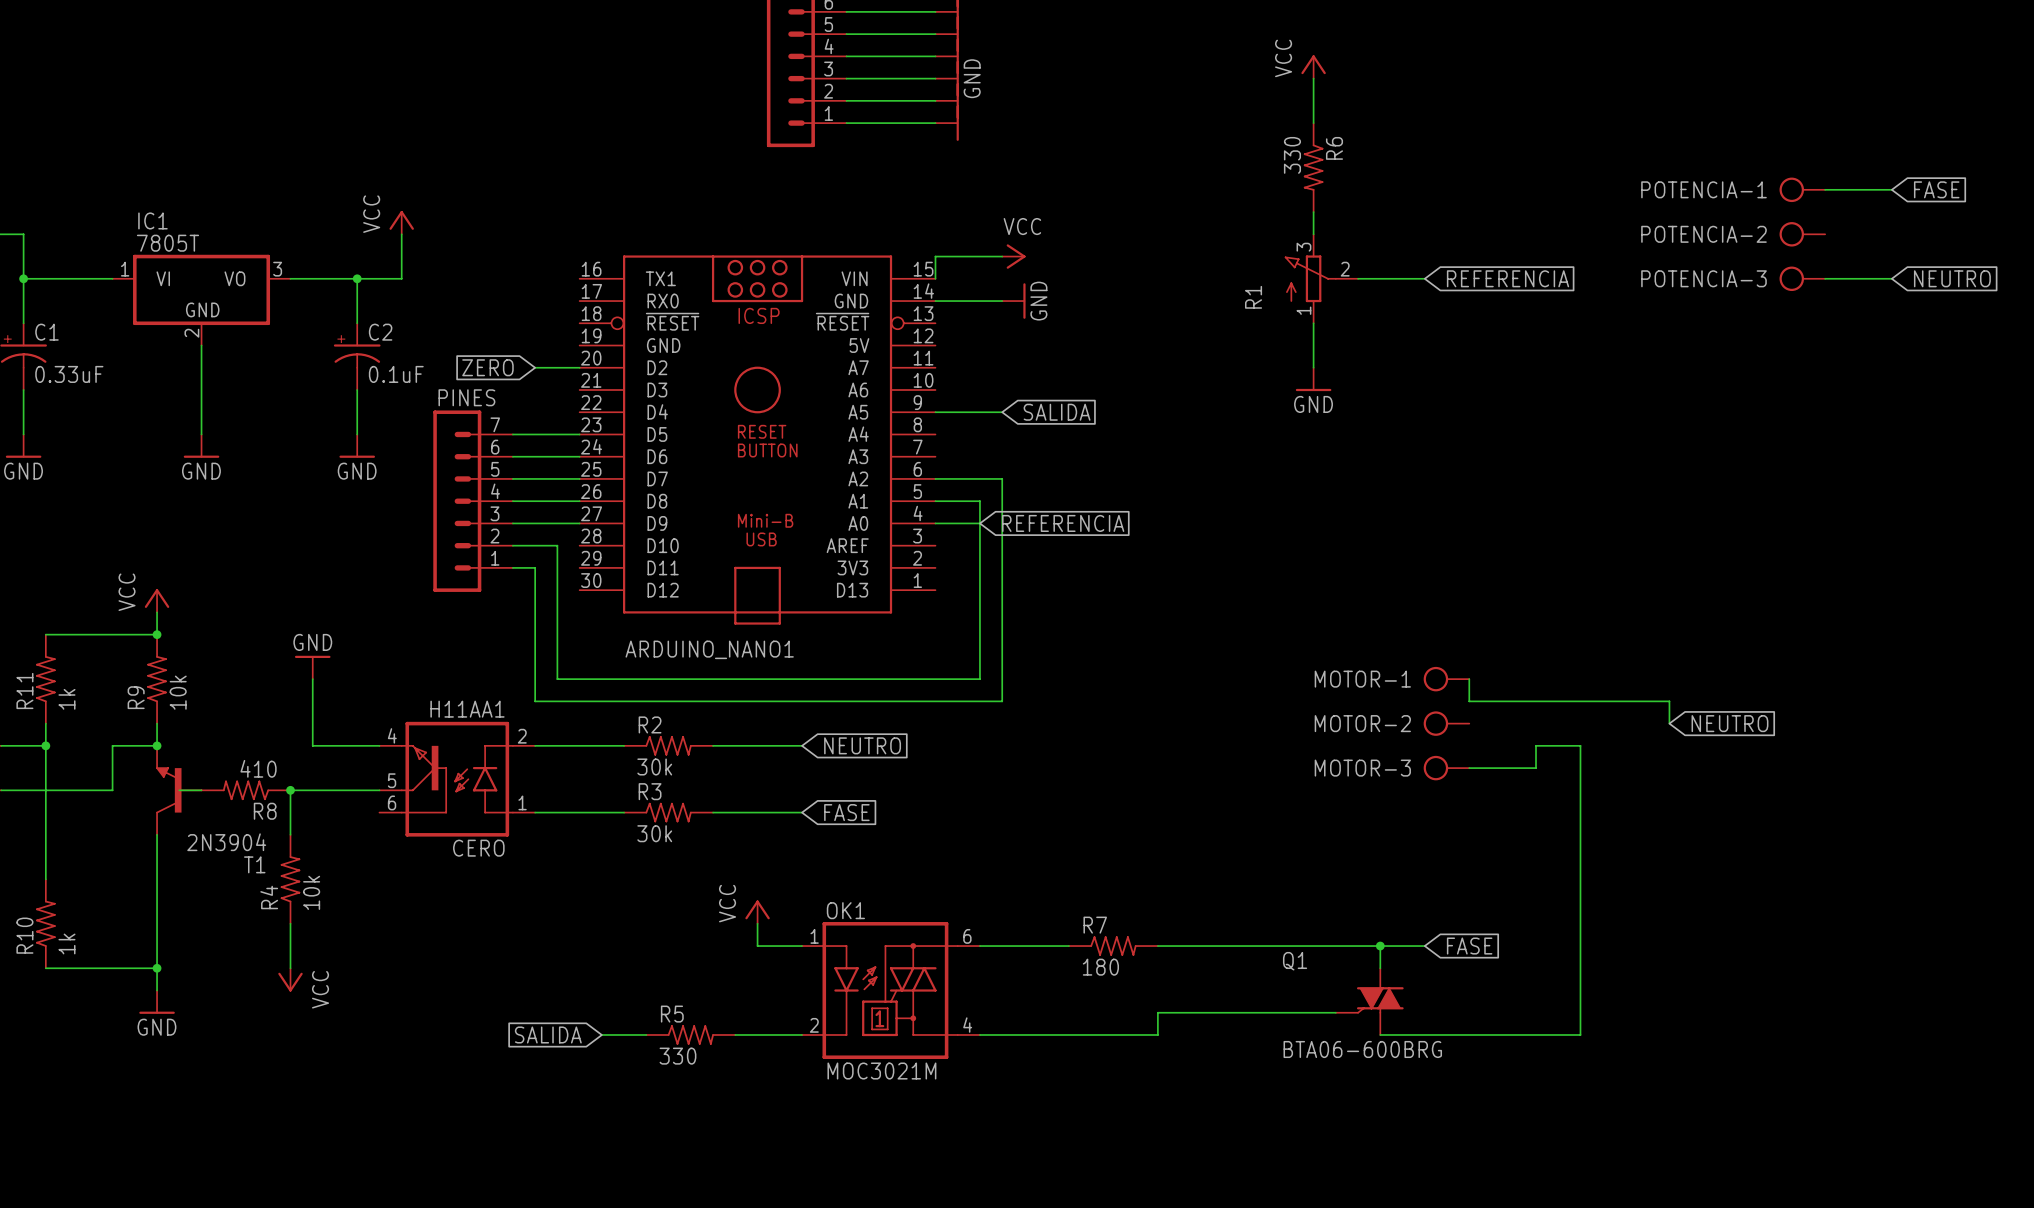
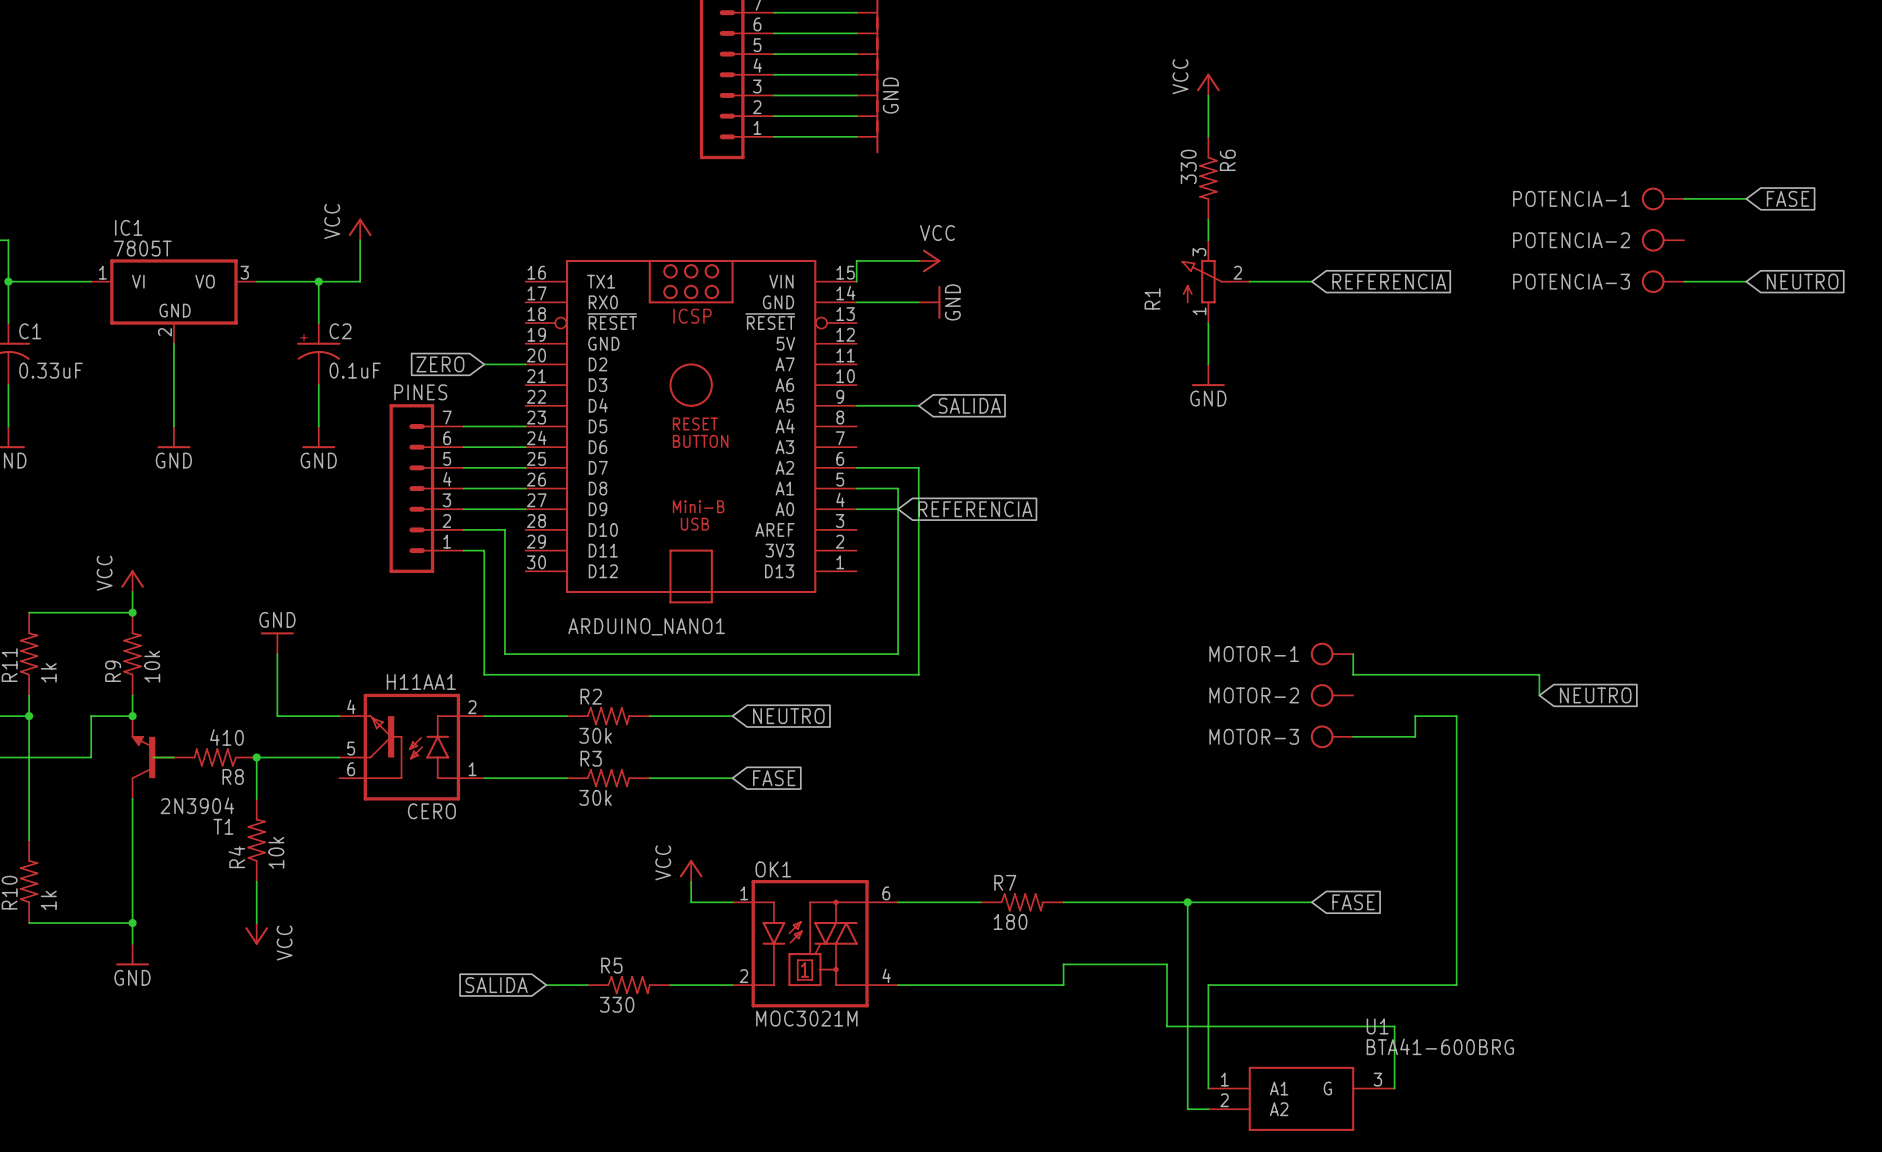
wire: none -> (1187, 902) (1187, 1109) (1208, 1109)
junction: none -> (1187, 902)
wire: (1380, 946) (1380, 968) -> none
junction: (1380, 946) -> none
Q1: BTA06-600BRG (1369, 1001) -> none
wire: (1269, 1012) (1335, 1012) -> (1167, 964) (1167, 1026) (1394, 1026) (1394, 1088)
wire: none -> (1270, 985) (1208, 985) (1208, 1088)
U1: none -> BTA41-600BRG (1301, 1098)

